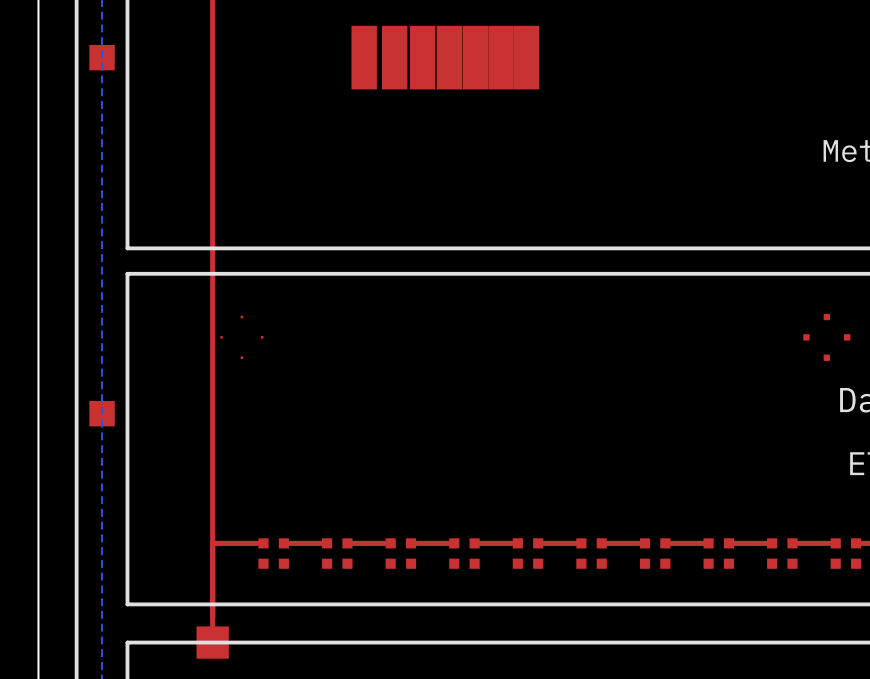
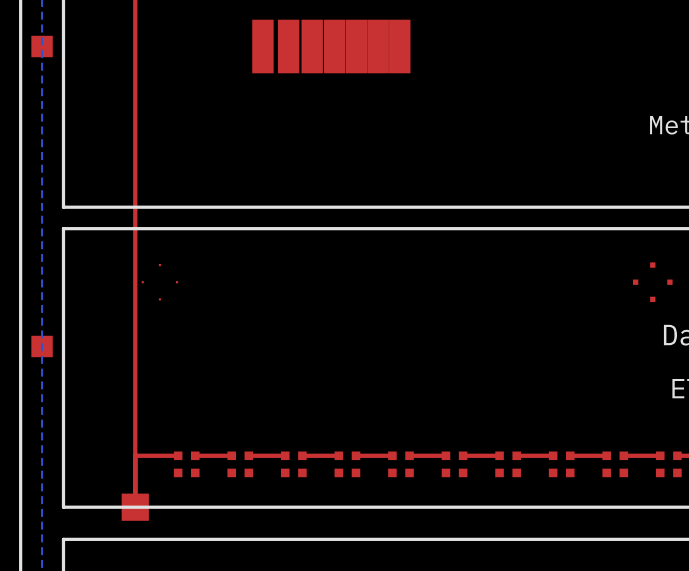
top track: (212, 604) (212, 642) -> none
part position: (212, 642) -> (135, 507)

